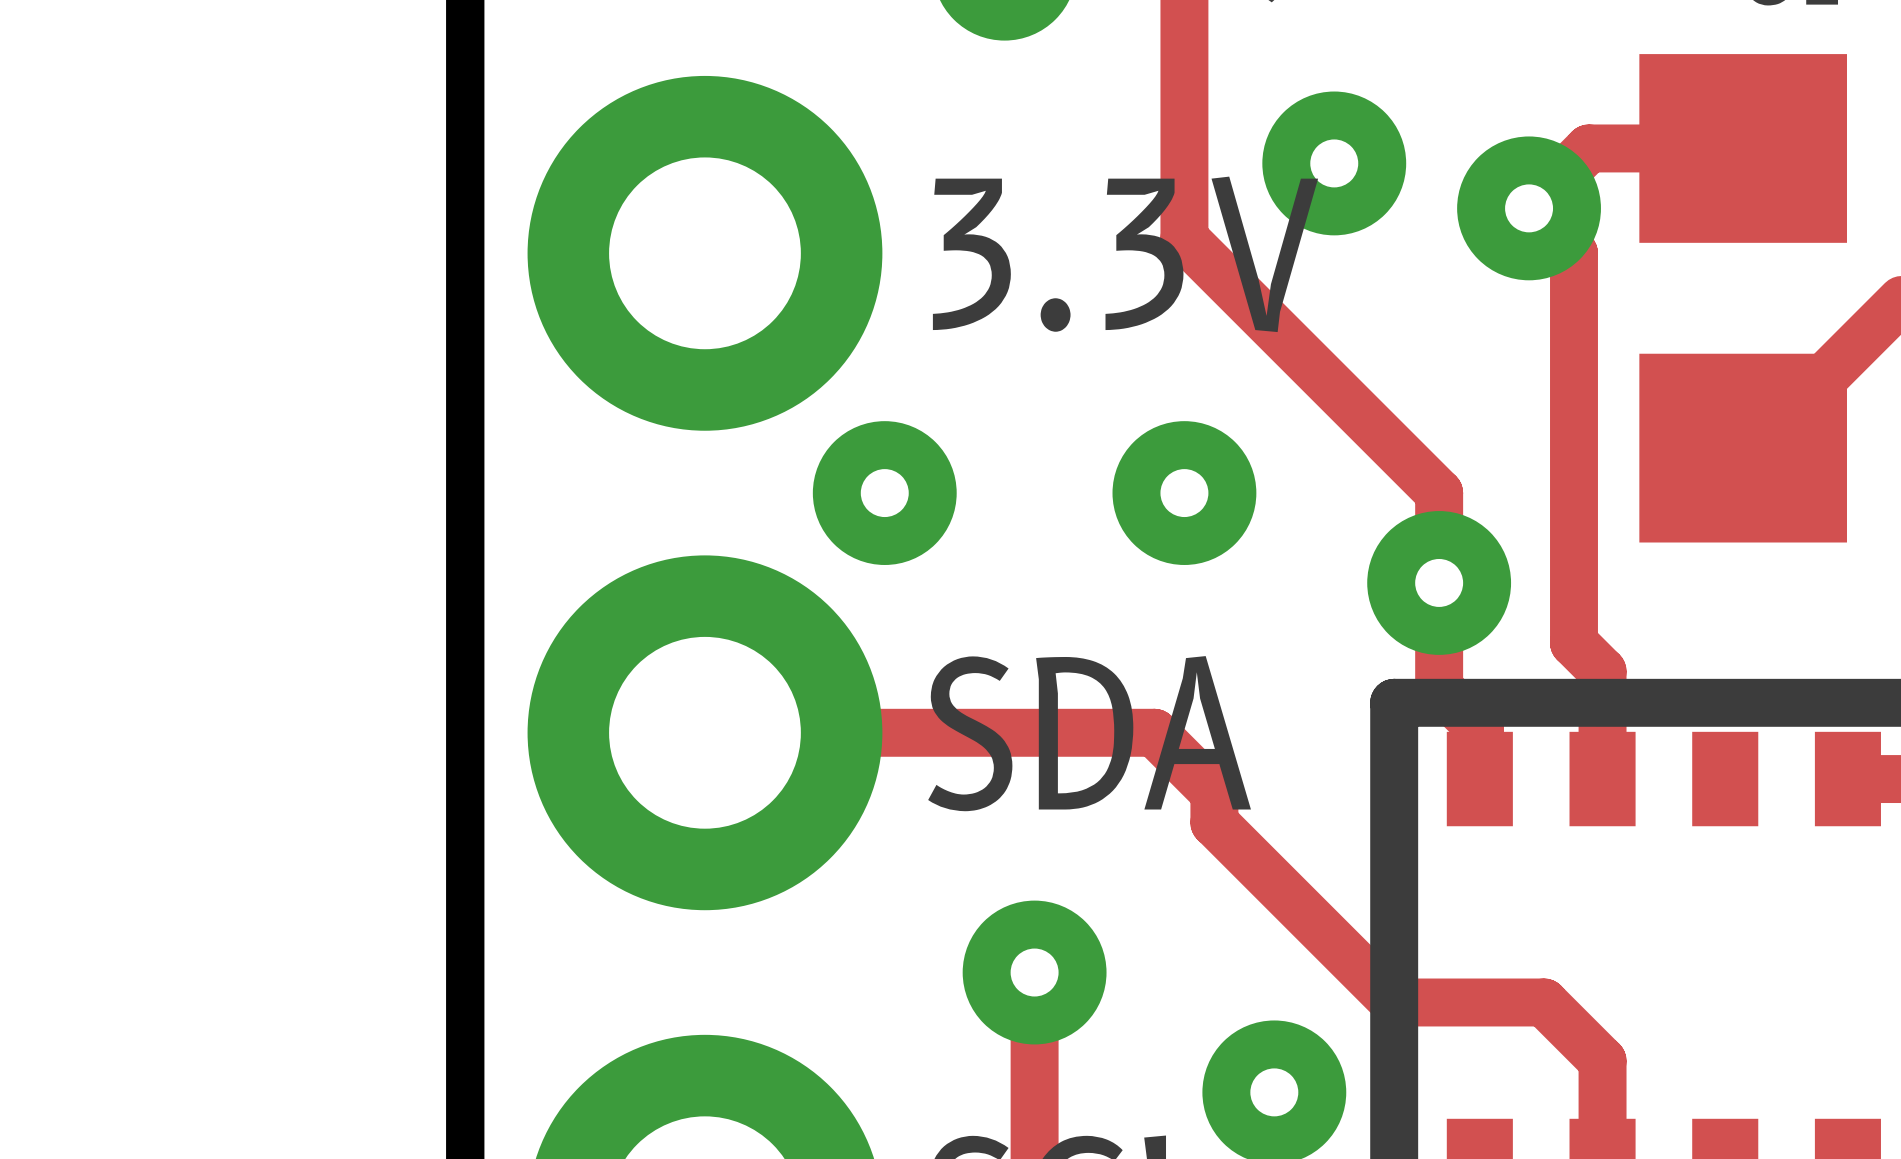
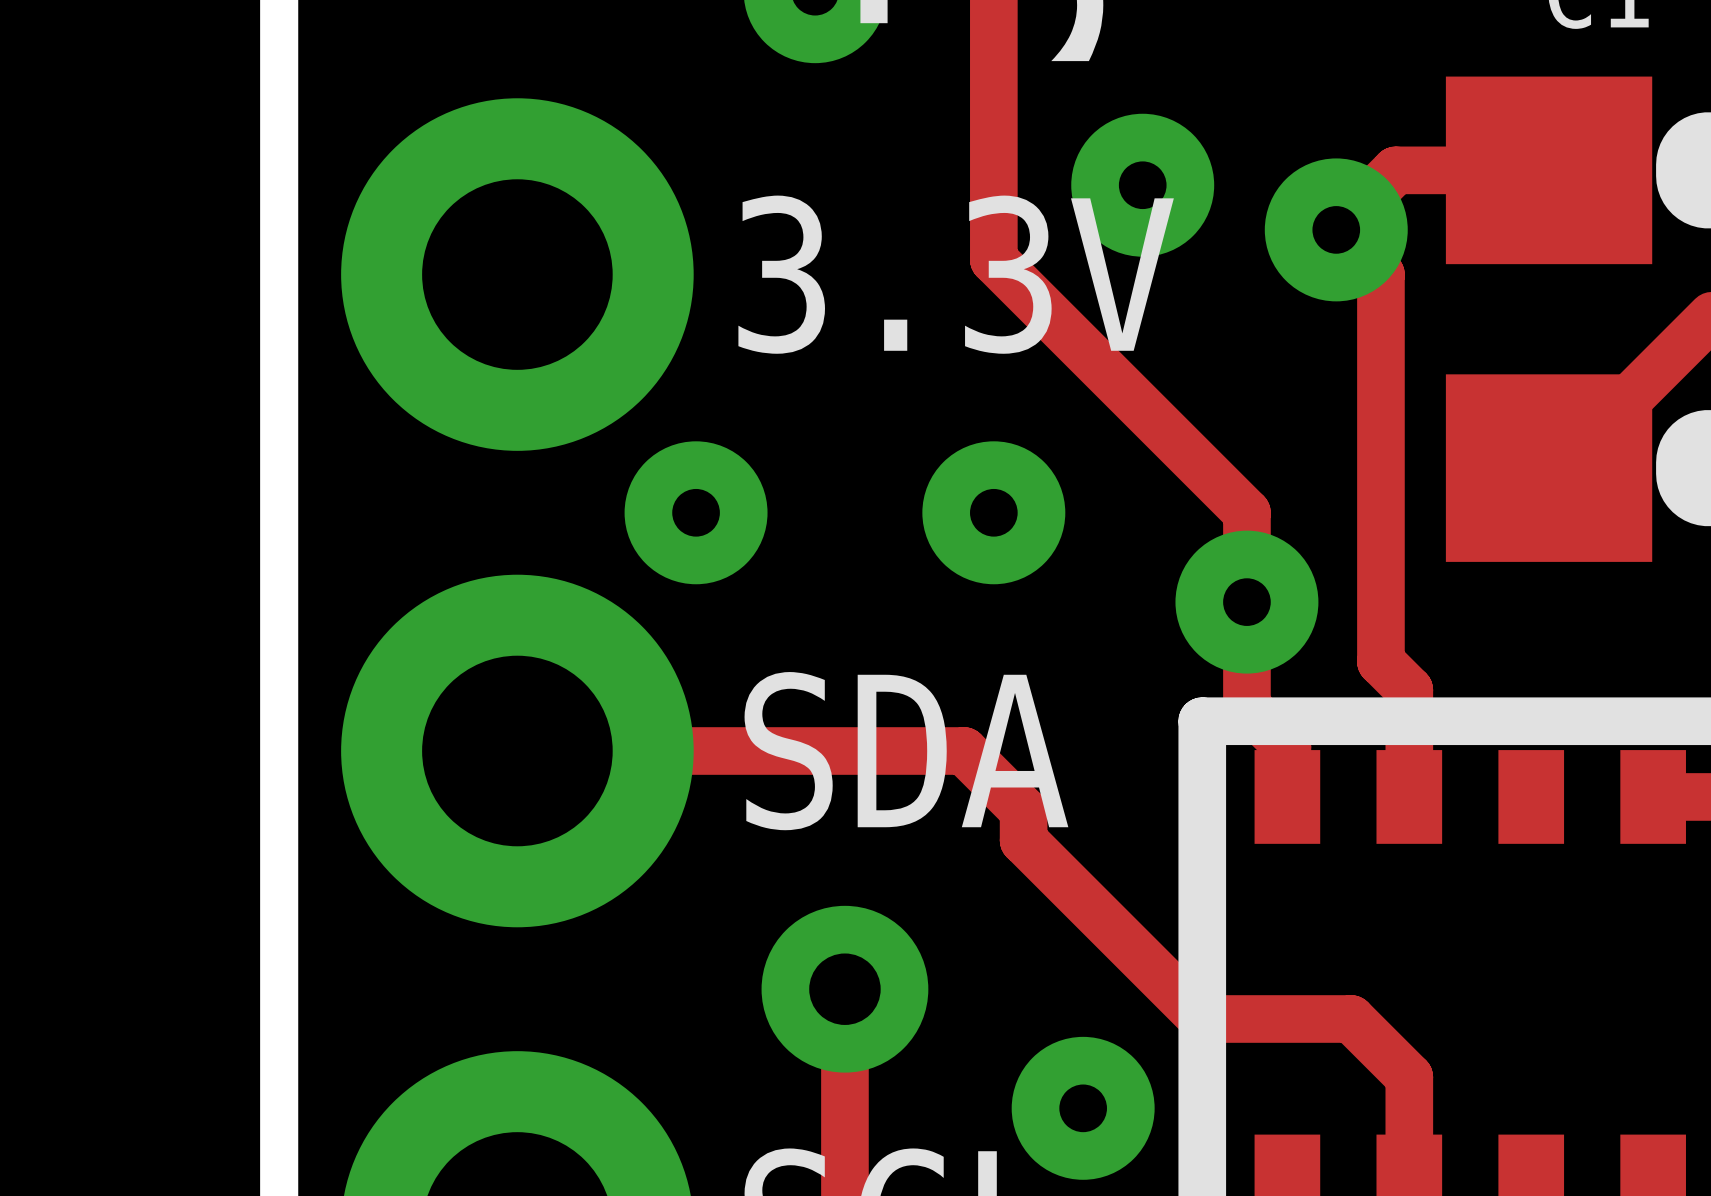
via size: [962, 900, 1107, 1045] -> [761, 905, 929, 1073]

